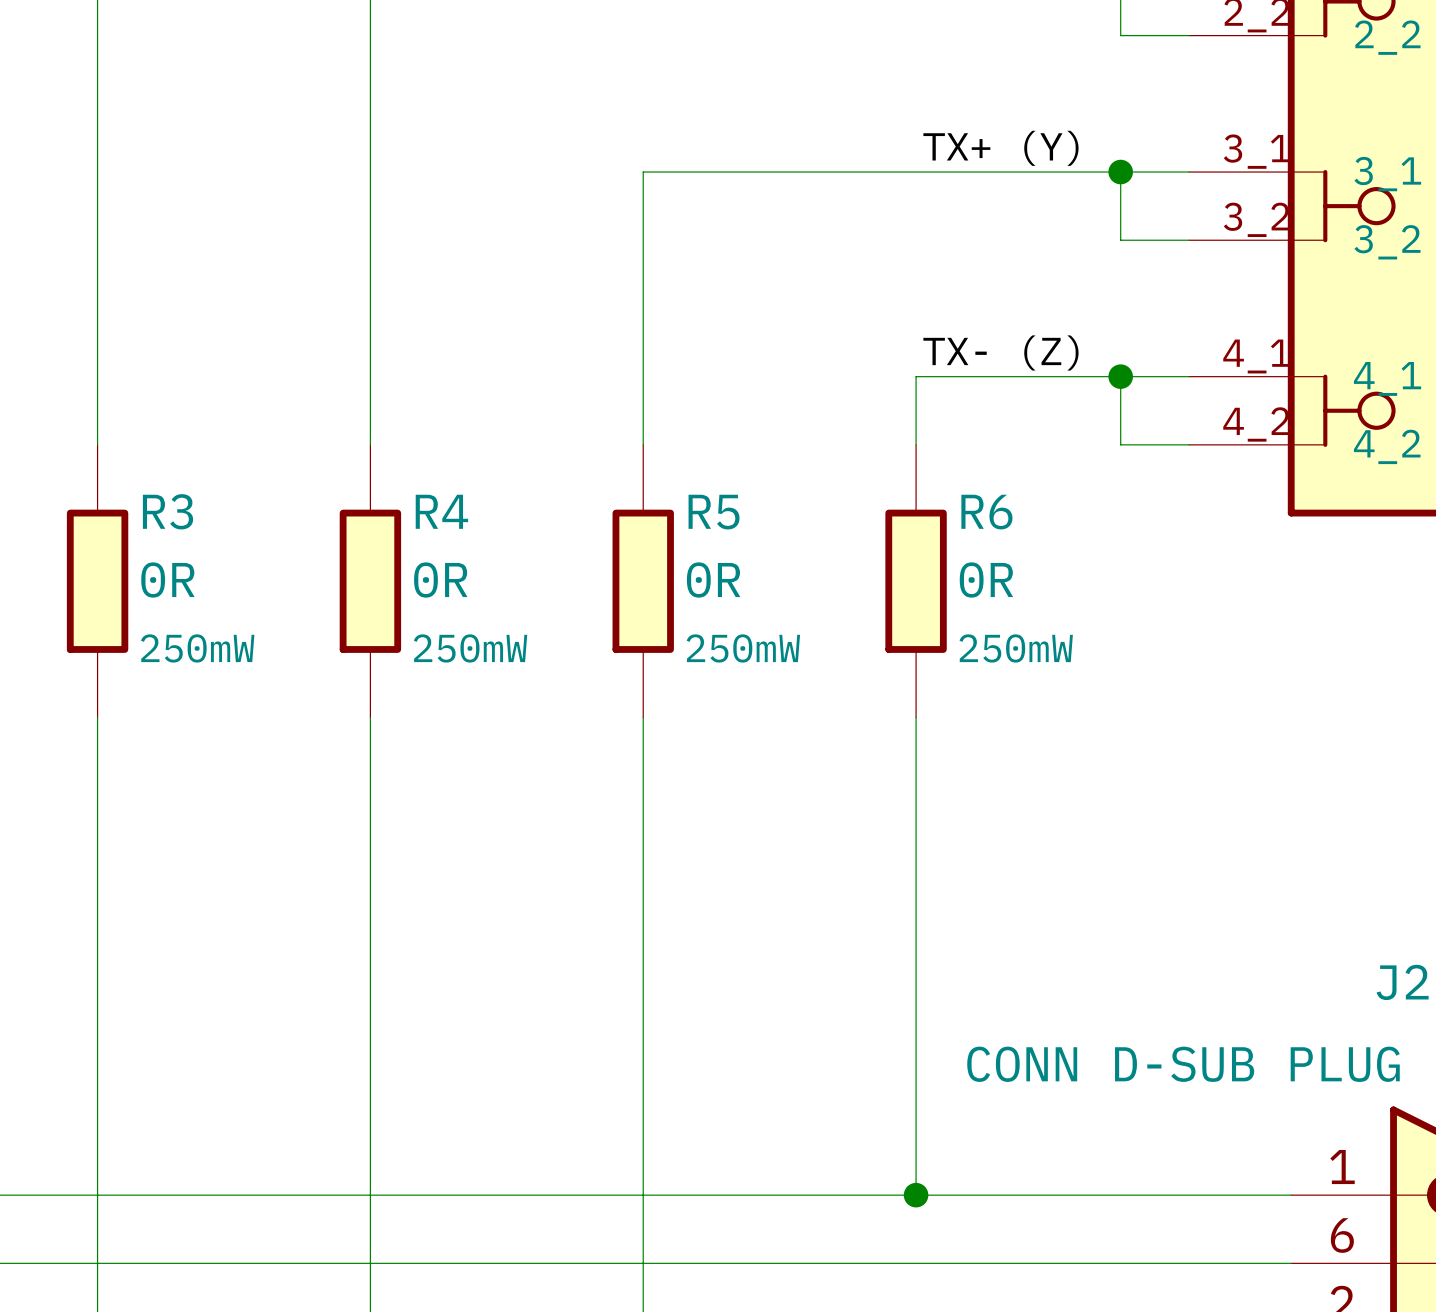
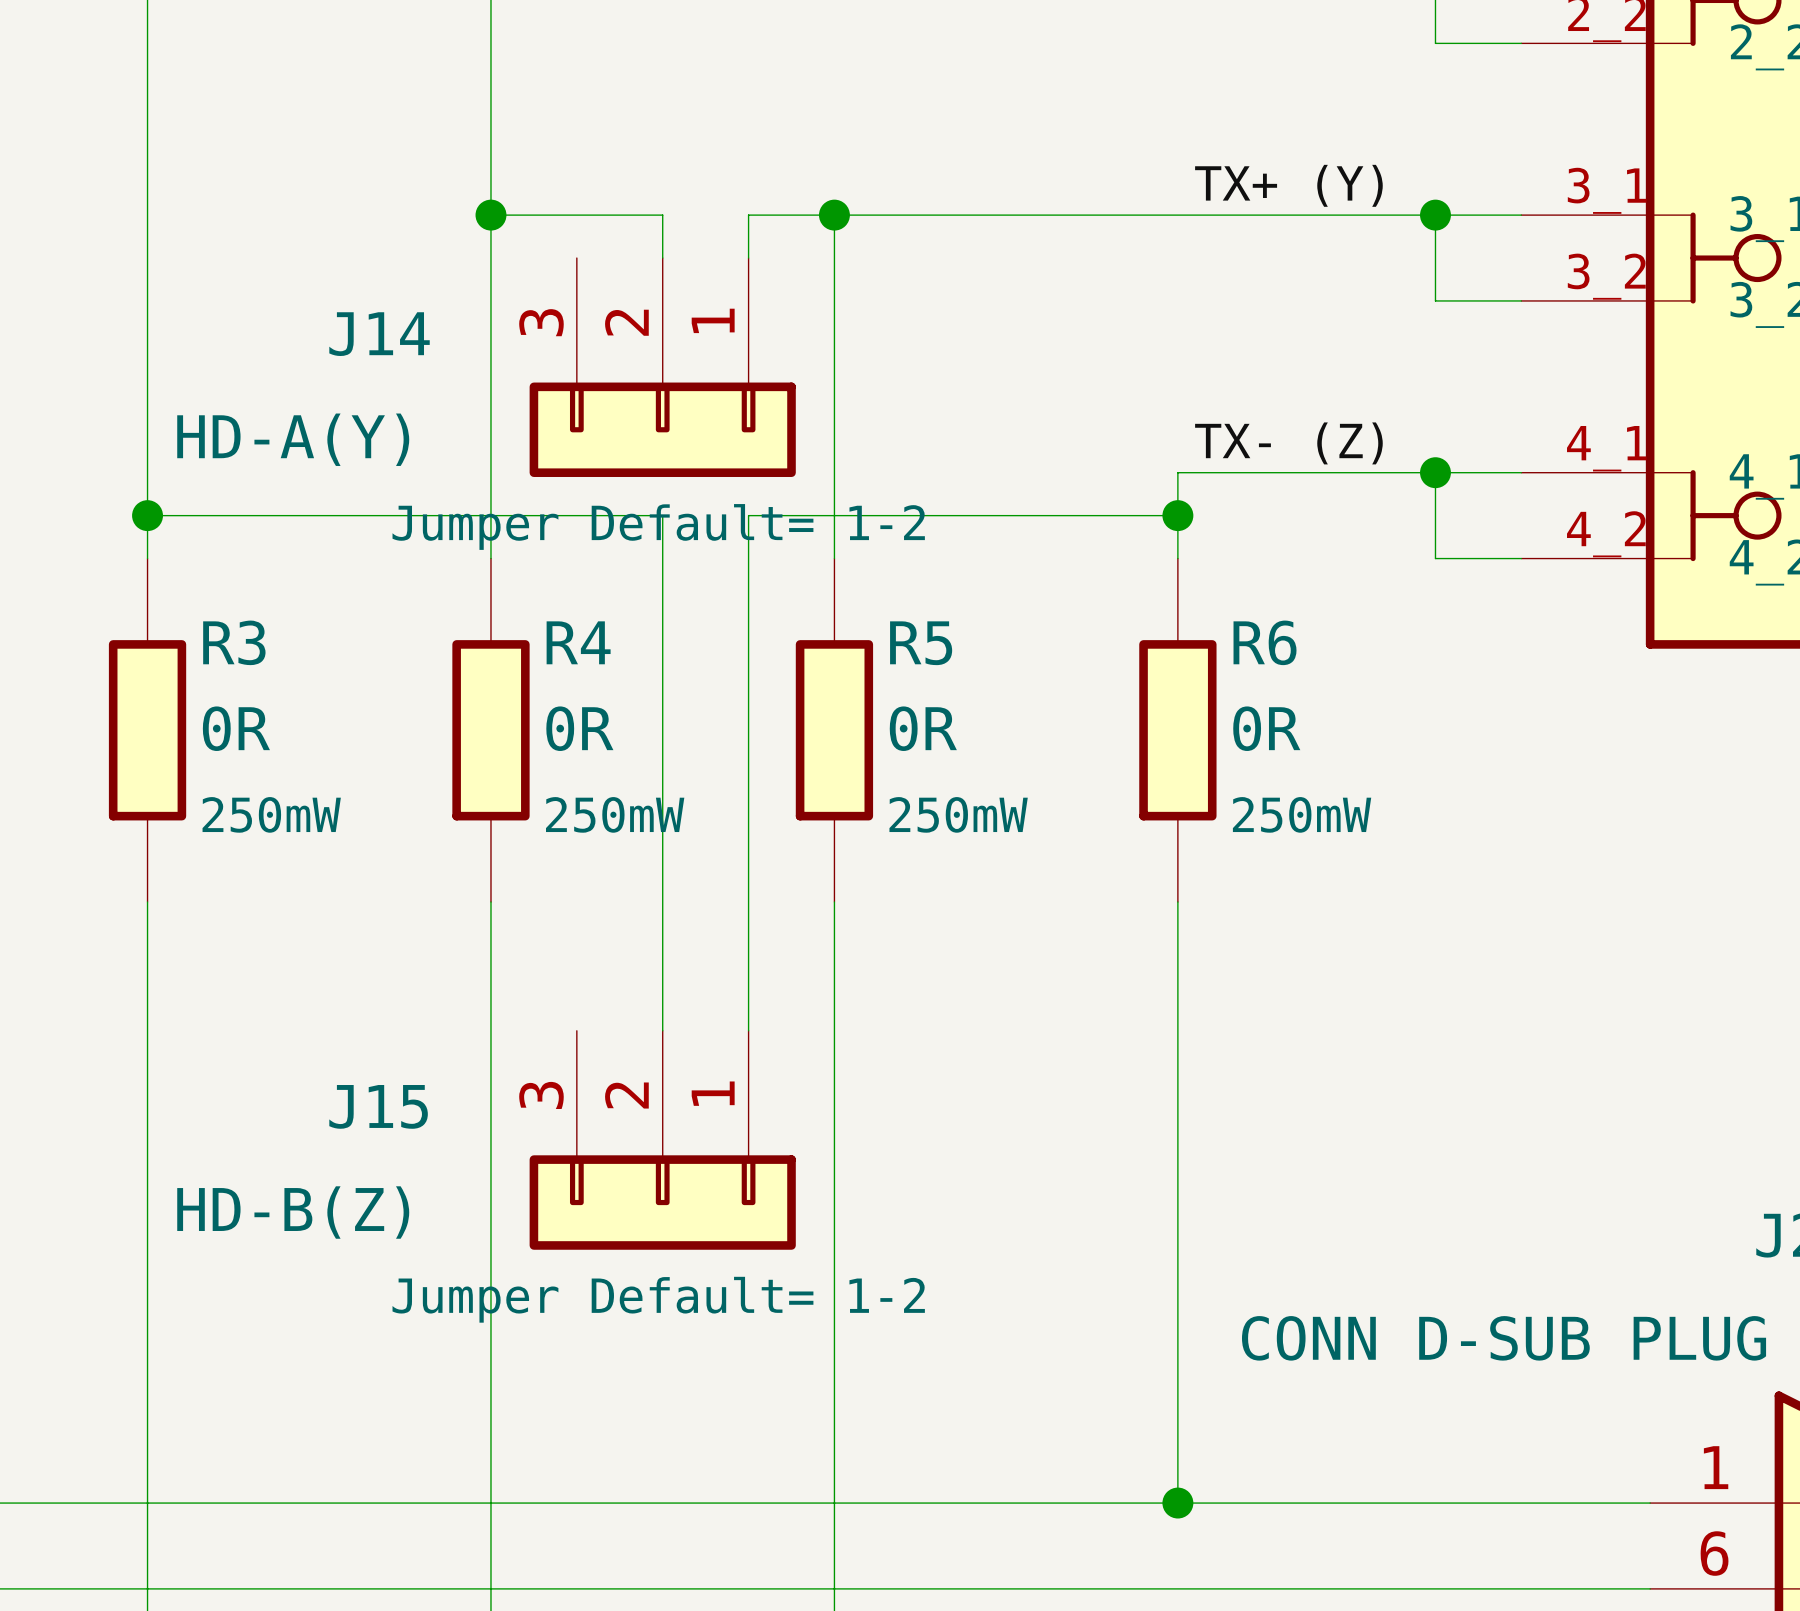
wire: none -> (490, 215) (662, 215) (662, 258)
junction: none -> (490, 215)
wire: none -> (834, 215) (748, 215) (748, 258)
junction: none -> (834, 215)
J14: none -> HD-A(Y) (662, 367)
wire: none -> (147, 515) (662, 515) (662, 1030)
junction: none -> (147, 515)
wire: none -> (1177, 515) (748, 515) (748, 1030)
junction: none -> (1177, 515)
J15: none -> HD-B(Z) (662, 1140)

